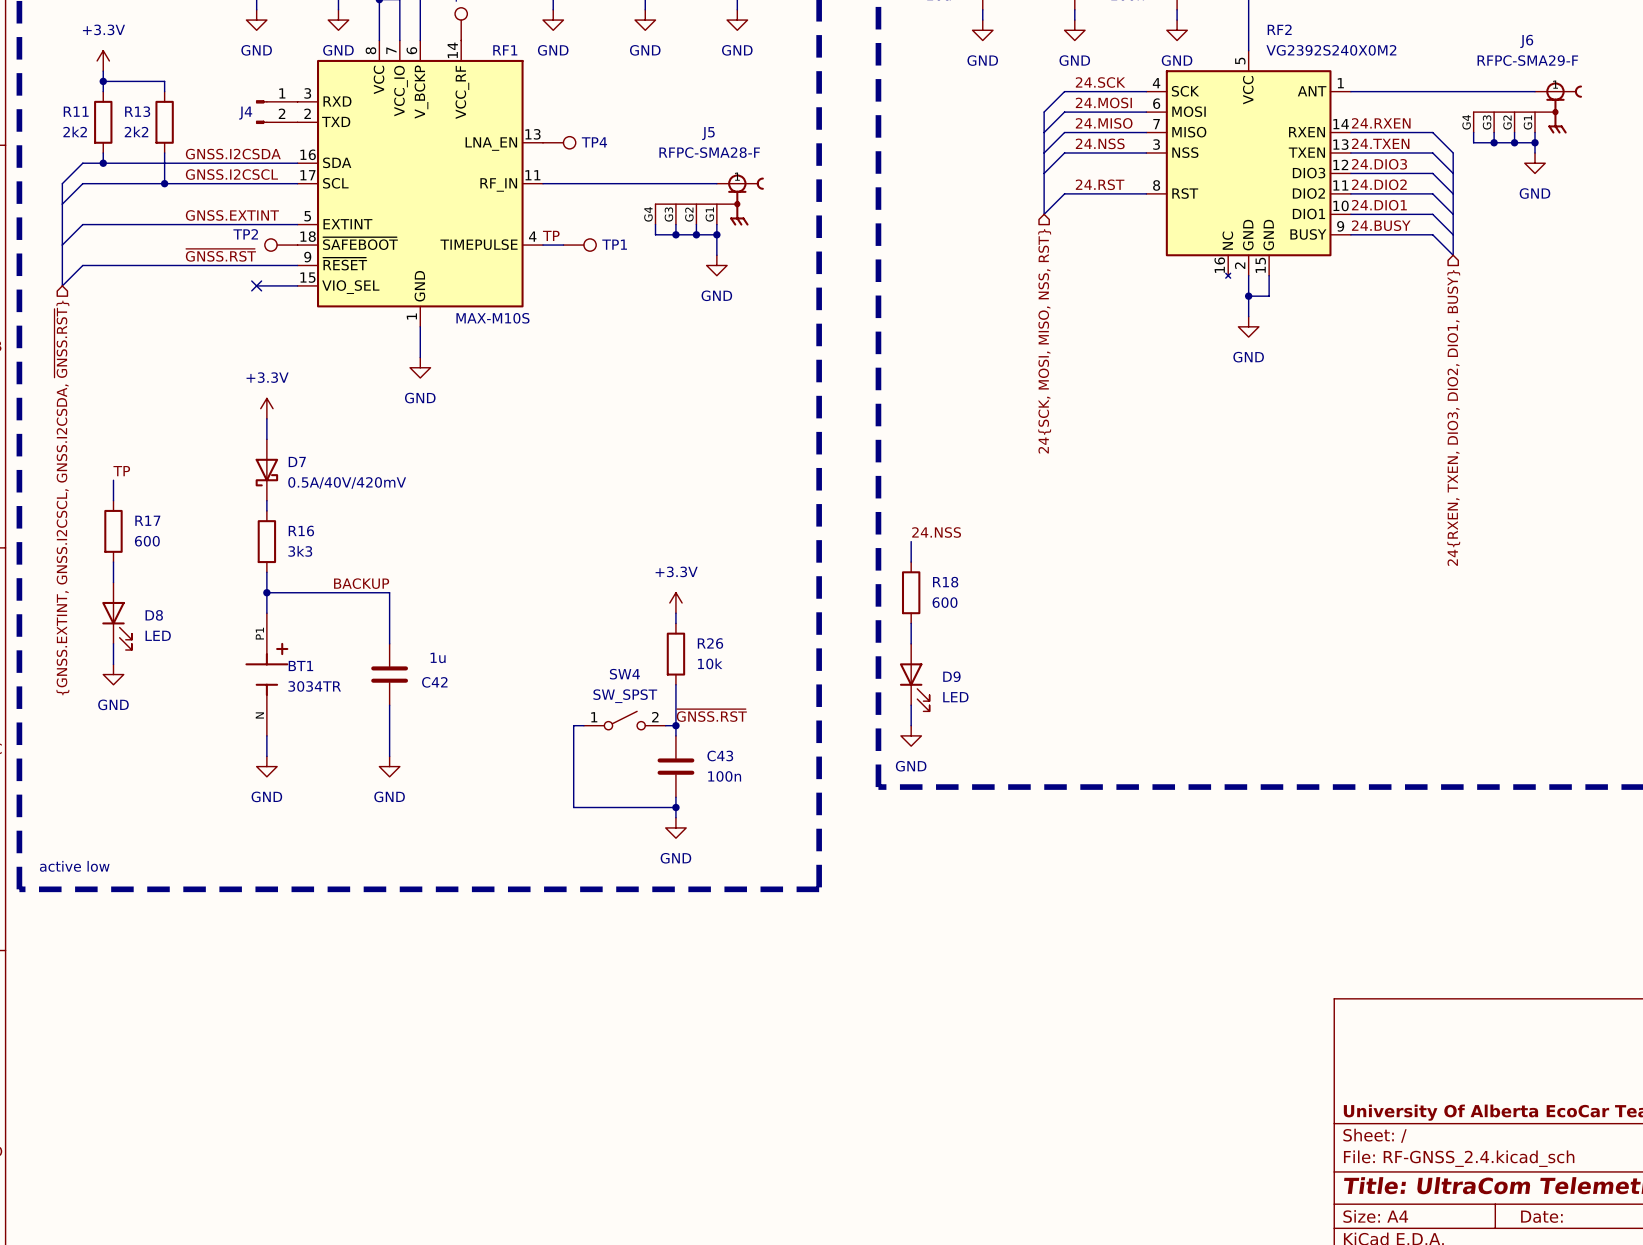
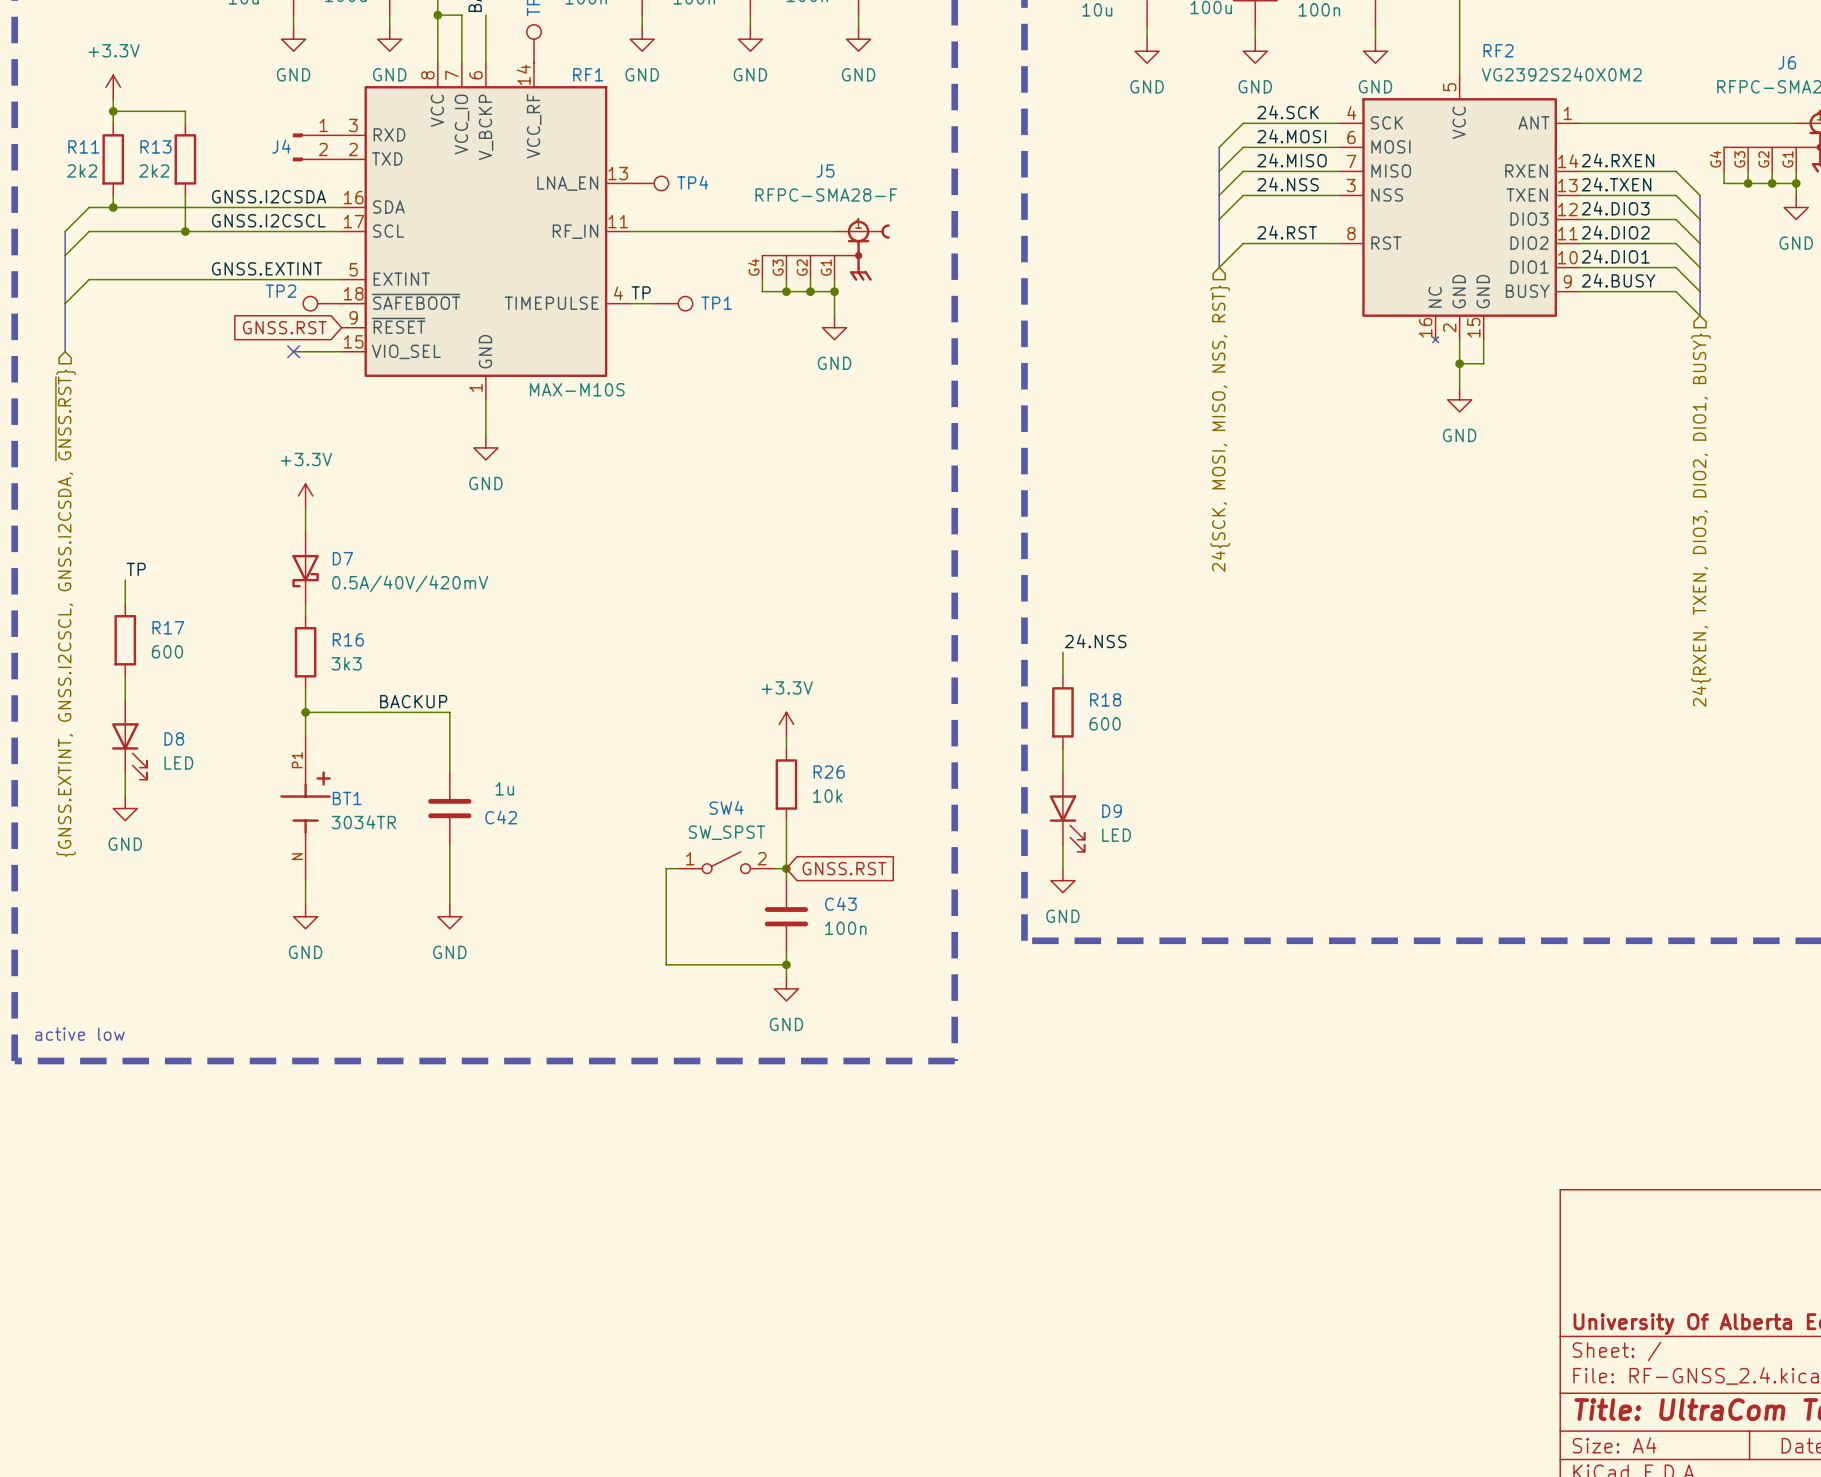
label: ~{GNSS.RST} (220, 255) -> none
global label: none -> GNSS.RST (284, 327)
wire: (297, 265) (82, 265) (62, 285) -> none
label: ~{GNSS.RST} (711, 715) -> none
global label: none -> GNSS.RST (844, 868)

